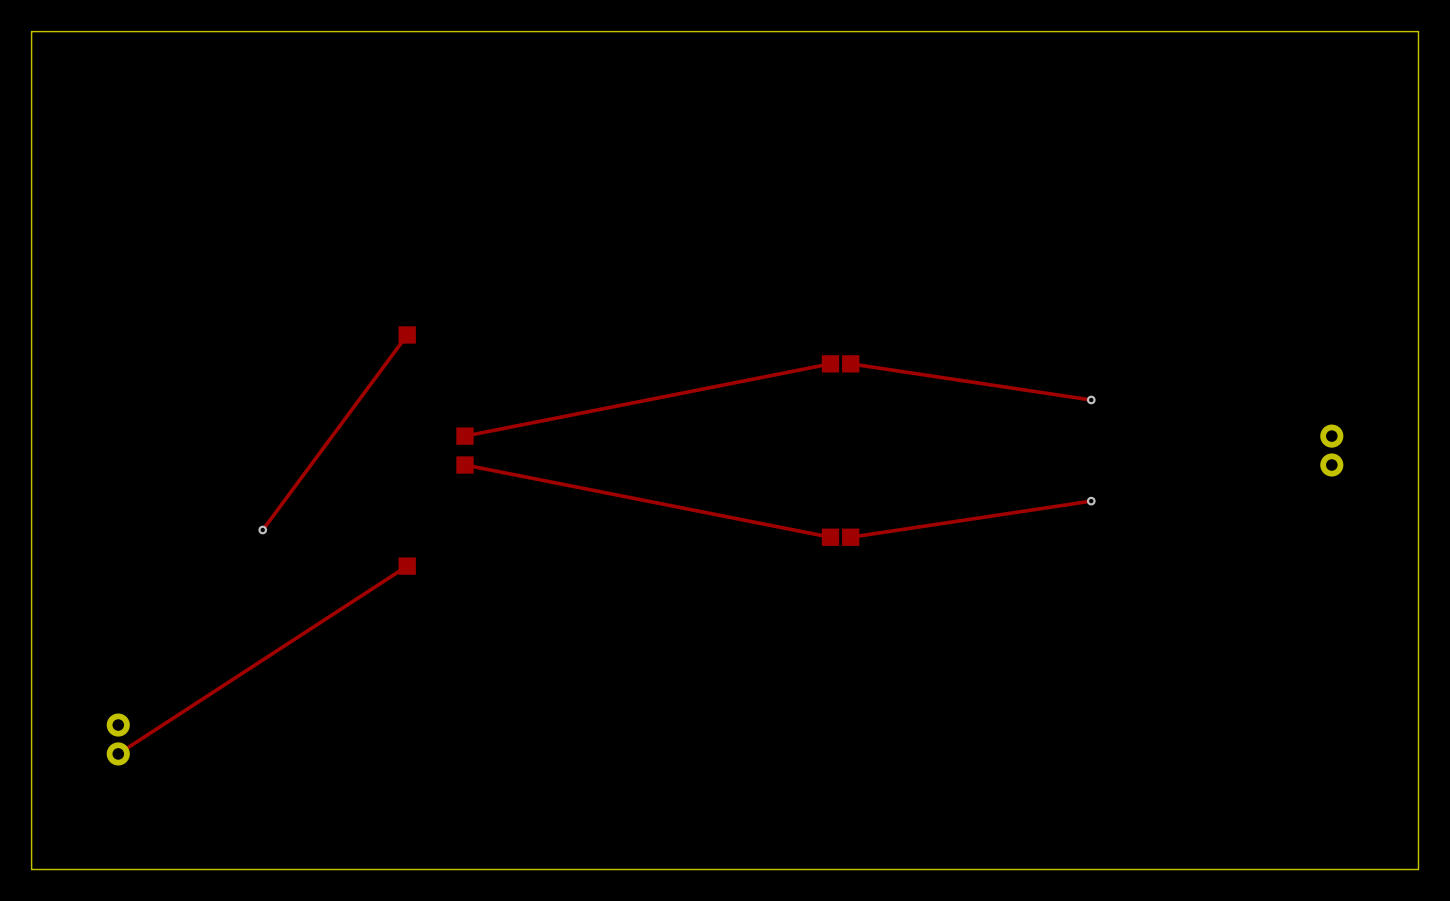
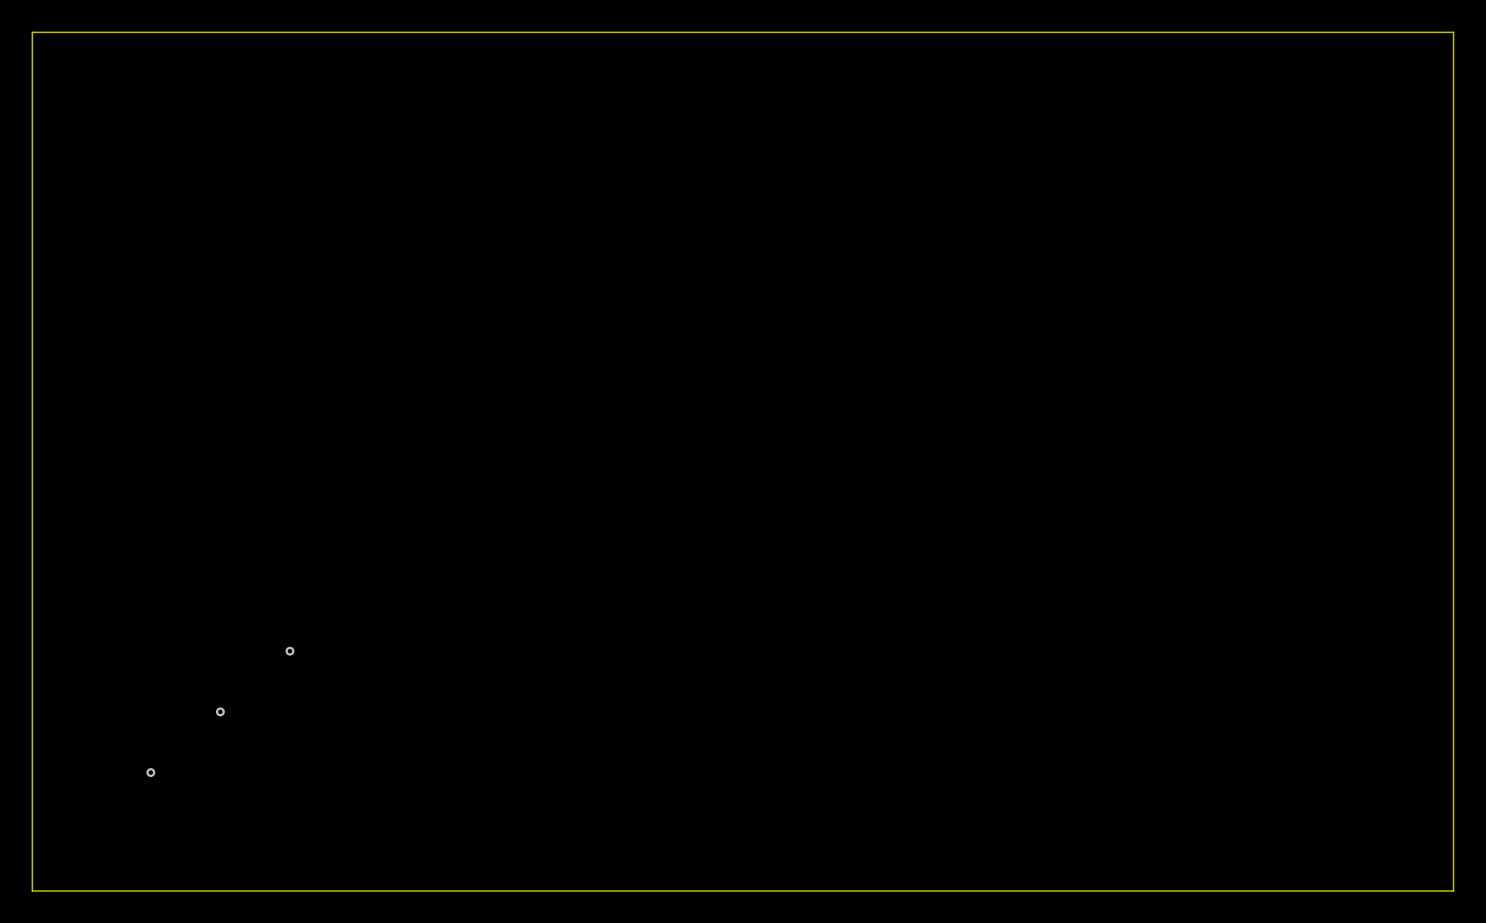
track: (407, 334) (262, 530) -> none
part: (407, 334) -> none
track: (830, 363) (464, 436) -> none
part: (840, 363) -> none
track: (850, 363) (1091, 399) -> none
via: (1091, 399) -> none
part: (464, 450) -> none
part: (1331, 450) -> none
track: (464, 464) (830, 537) -> none
track: (1091, 501) (850, 537) -> none
via: (1091, 501) -> none
via: (262, 530) -> none
part: (840, 537) -> none
track: (407, 566) (118, 753) -> none
part: (407, 566) -> none
via: none -> (289, 651)
via: none -> (220, 711)
part: (118, 739) -> none
via: none -> (150, 772)

